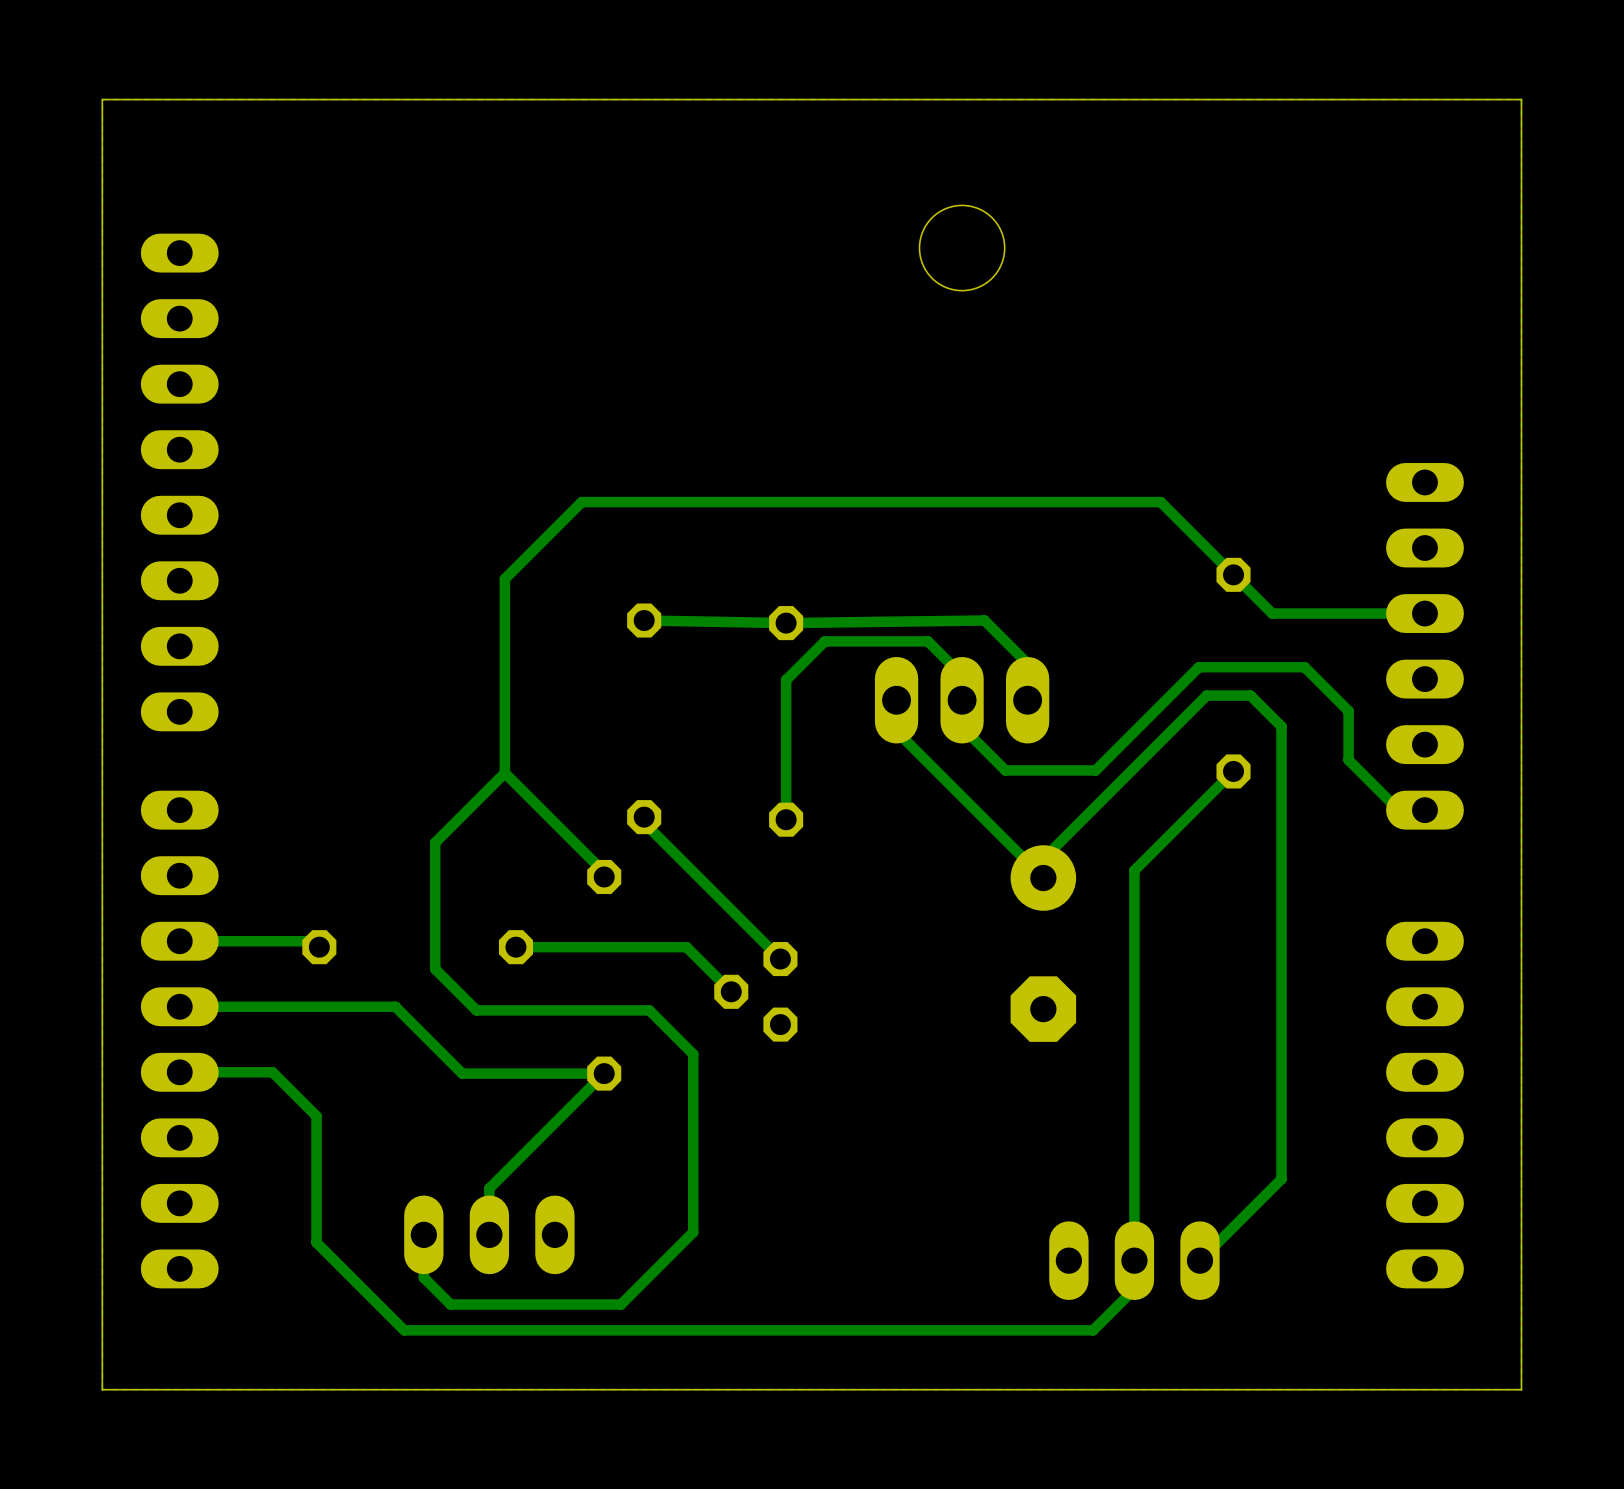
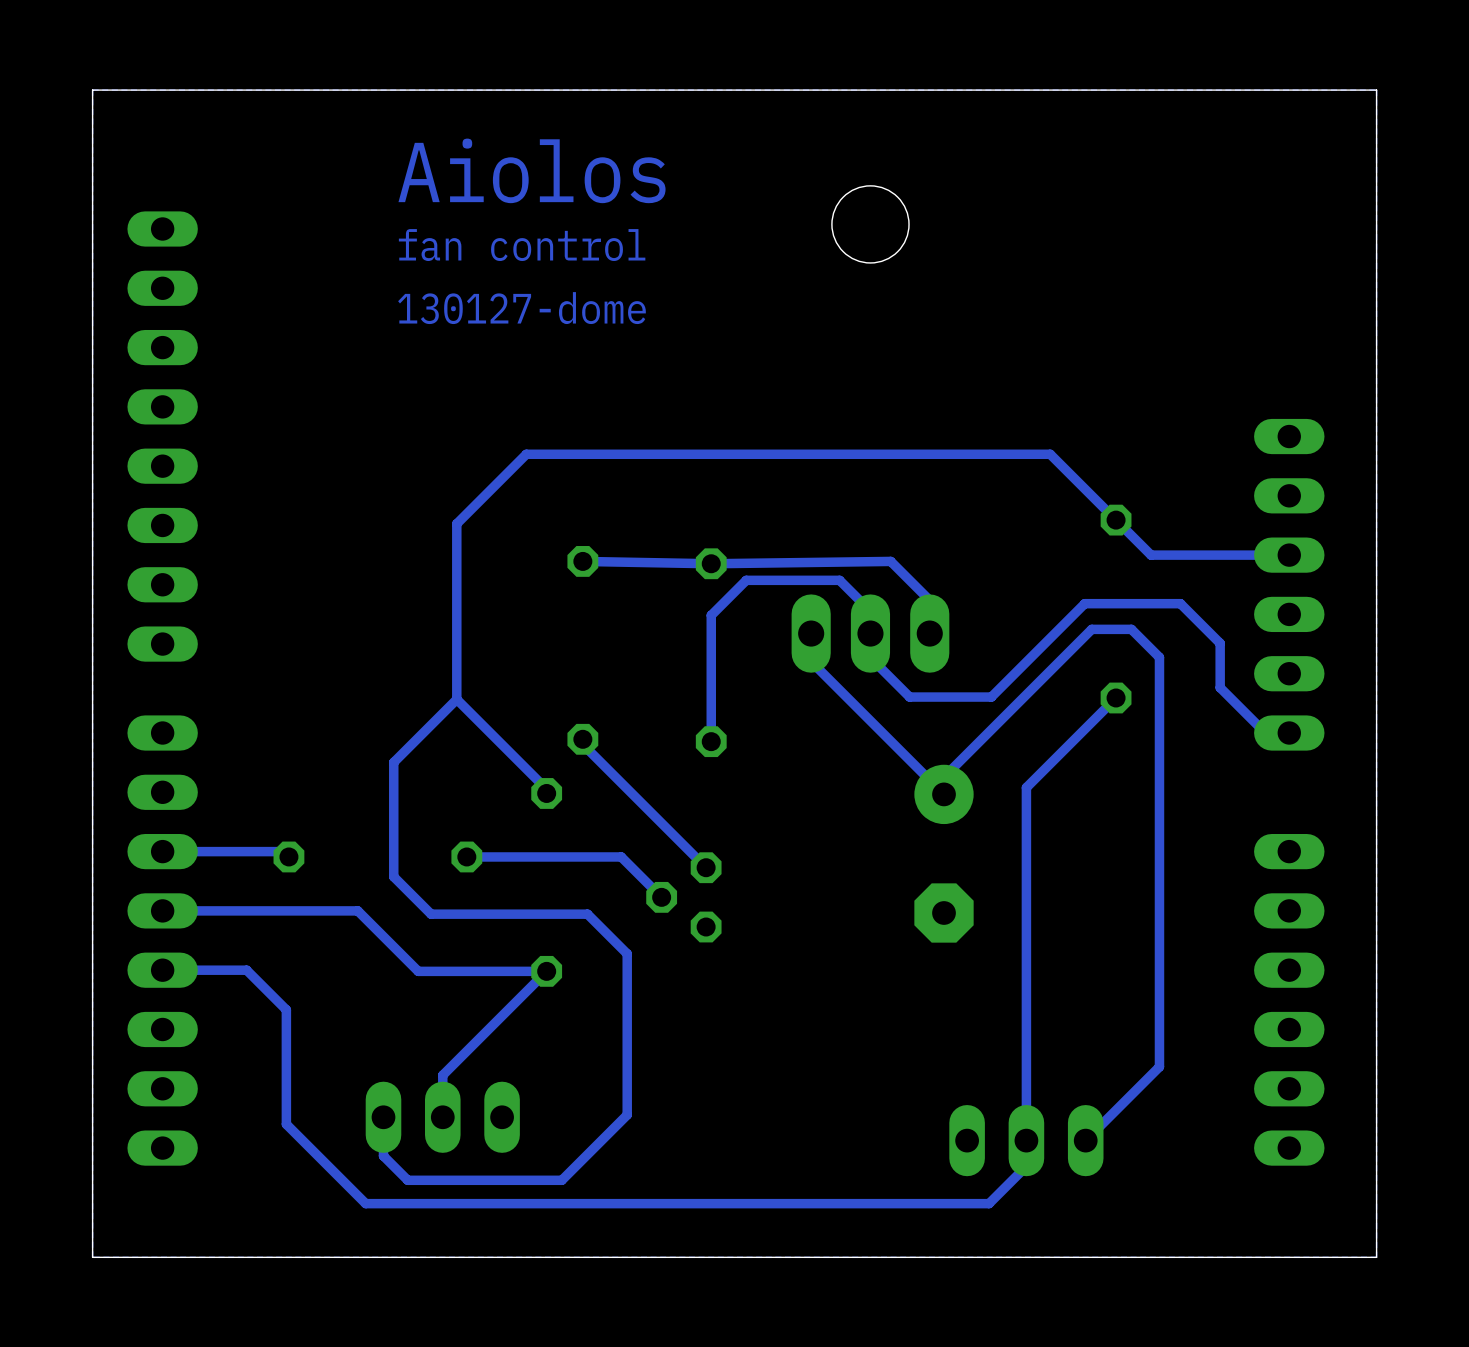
text: none -> Aiolos (532, 170)
text: none -> fan control (522, 245)
text: none -> 130127-dome (521, 308)

